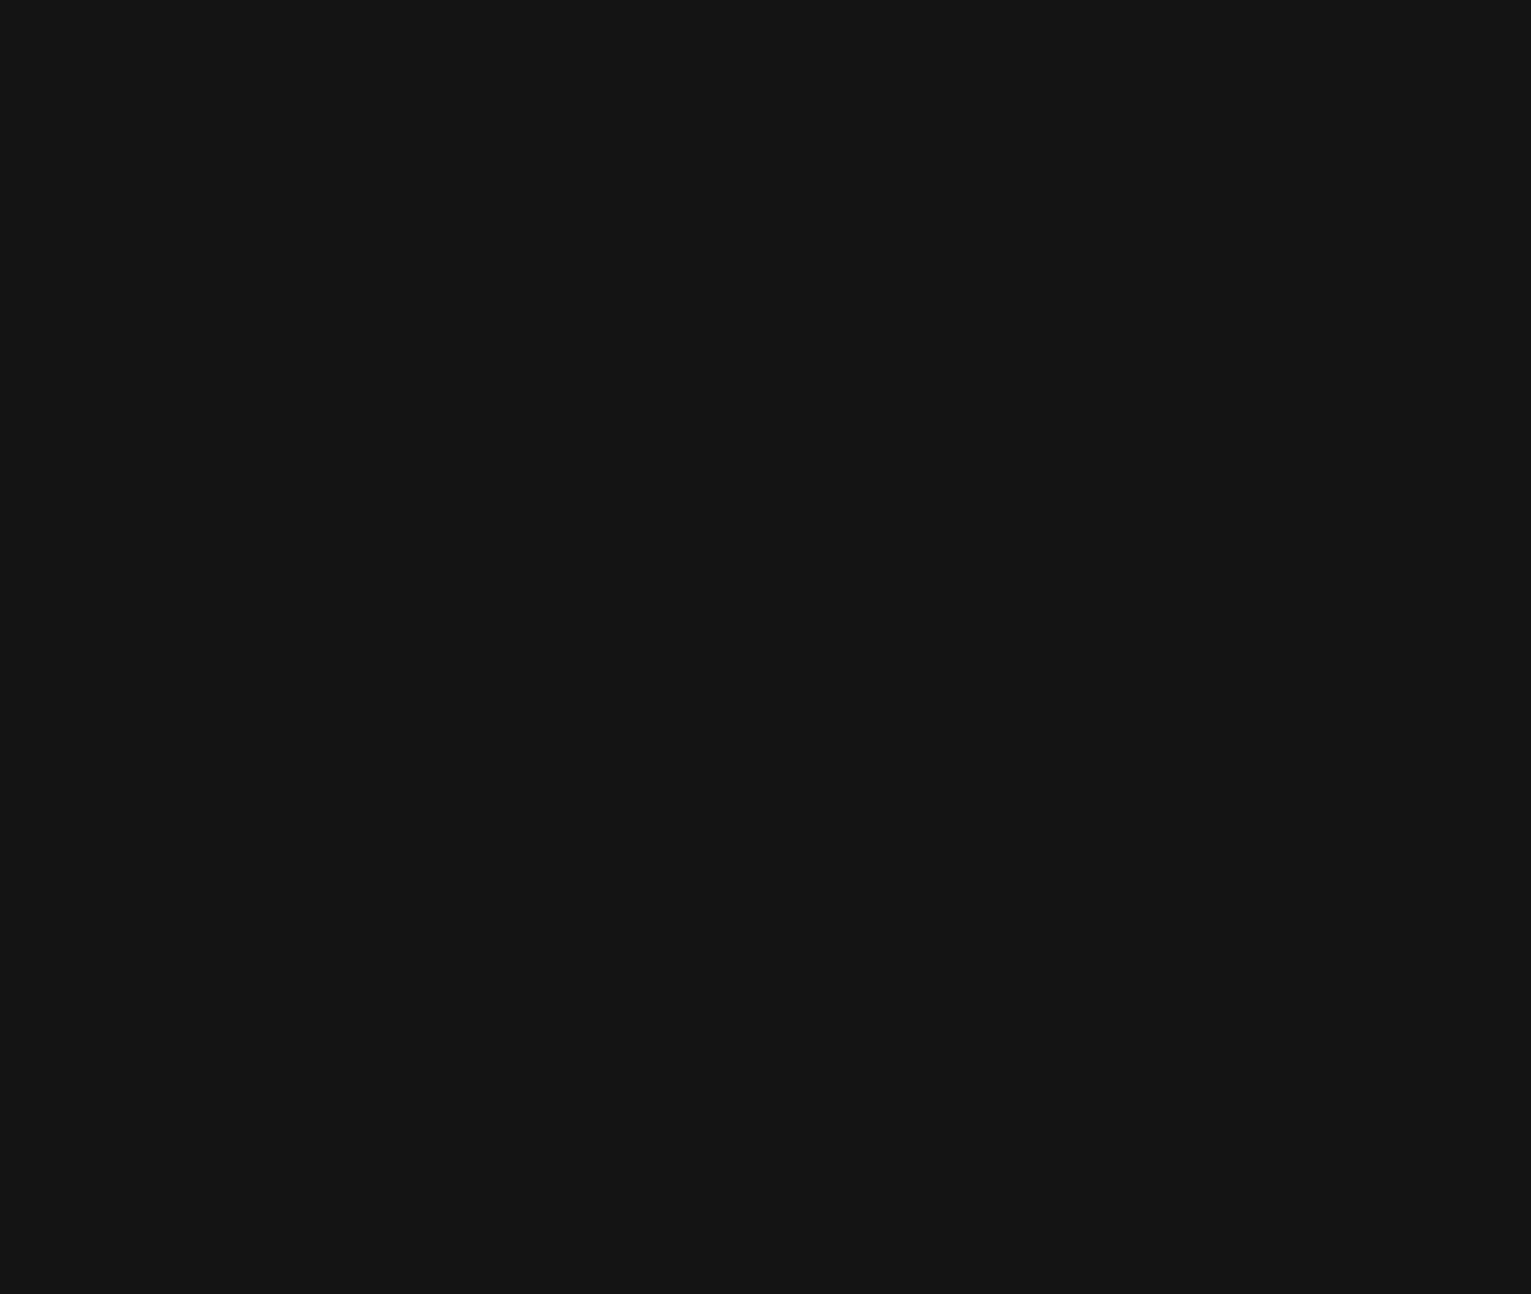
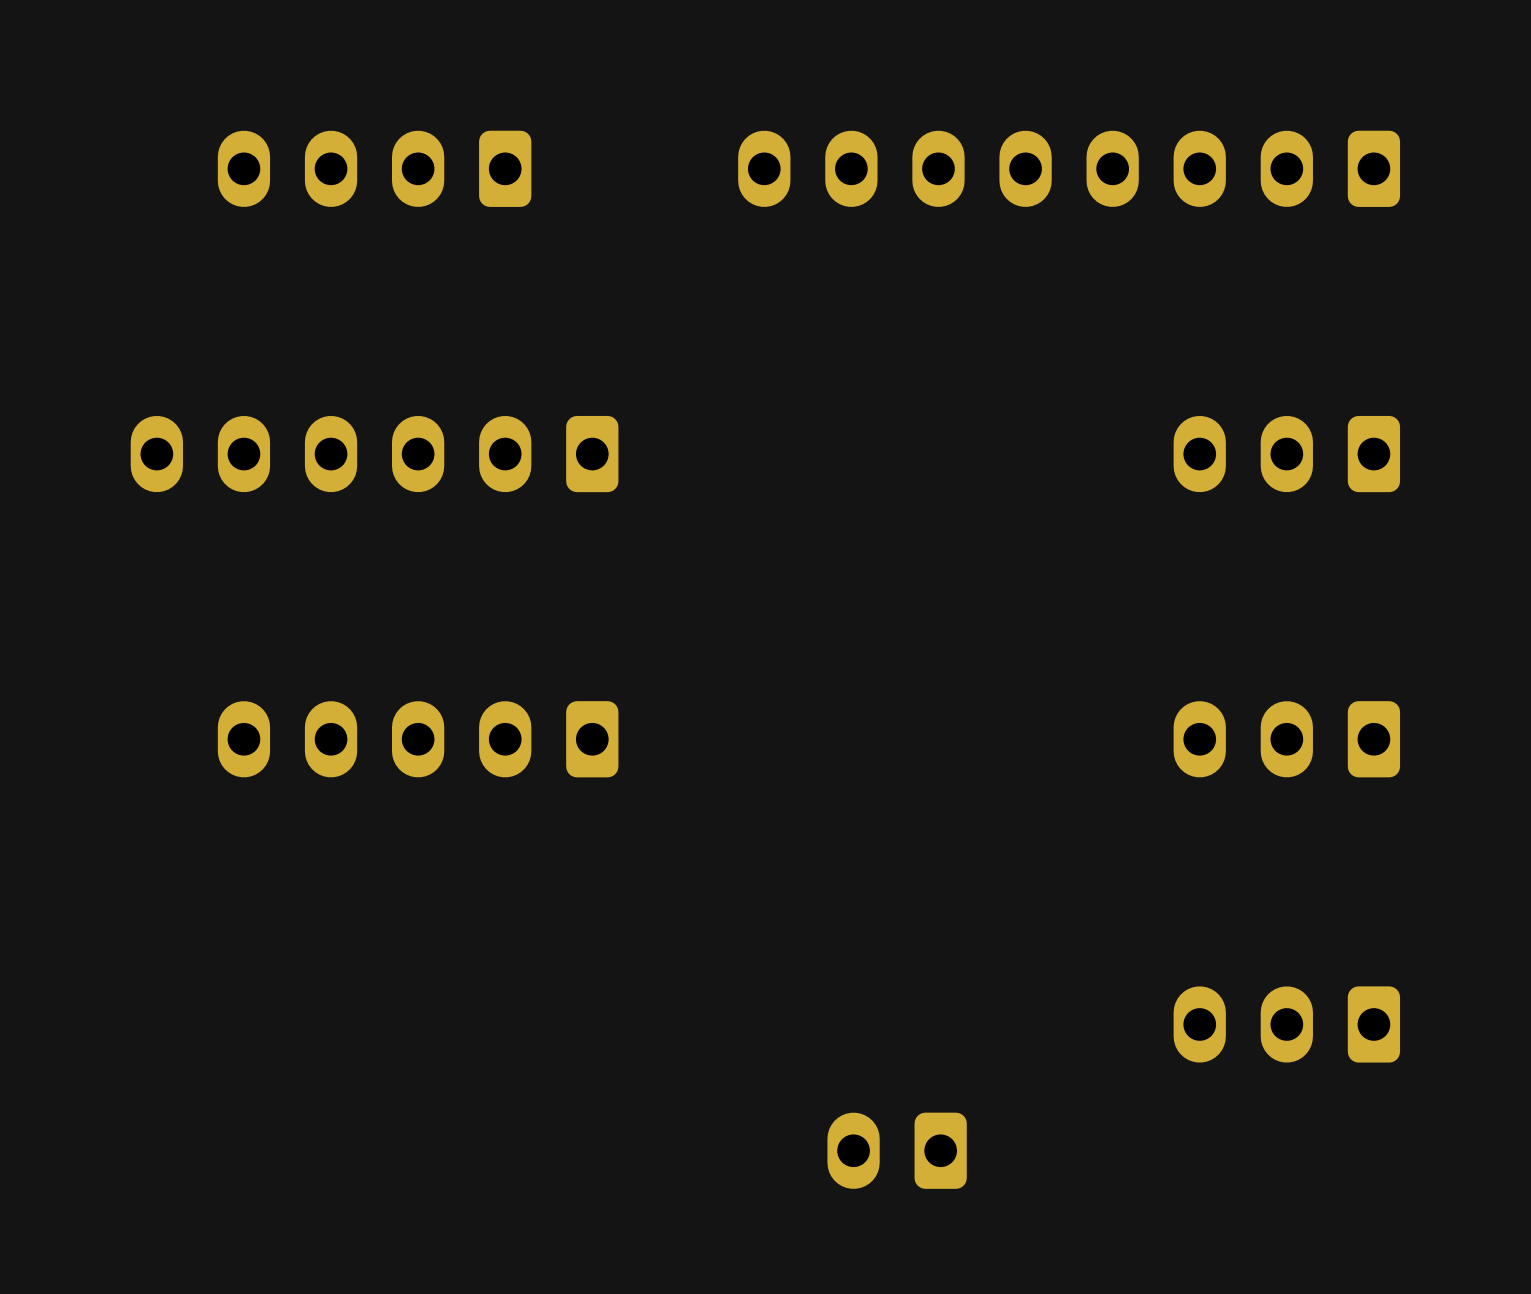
part: none -> (374, 168)
part: none -> (1069, 168)
part: none -> (374, 454)
part: none -> (1286, 454)
part: none -> (418, 739)
part: none -> (1286, 739)
part: none -> (1286, 1024)
part: none -> (897, 1150)

